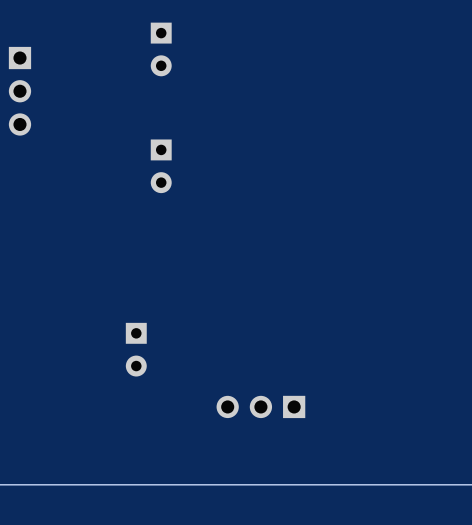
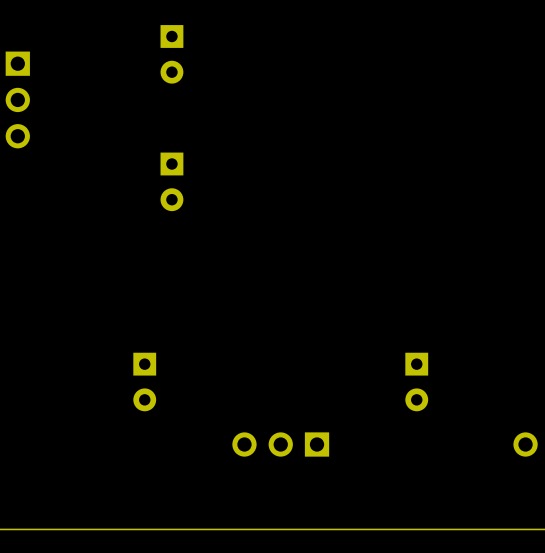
part: none -> (416, 382)

